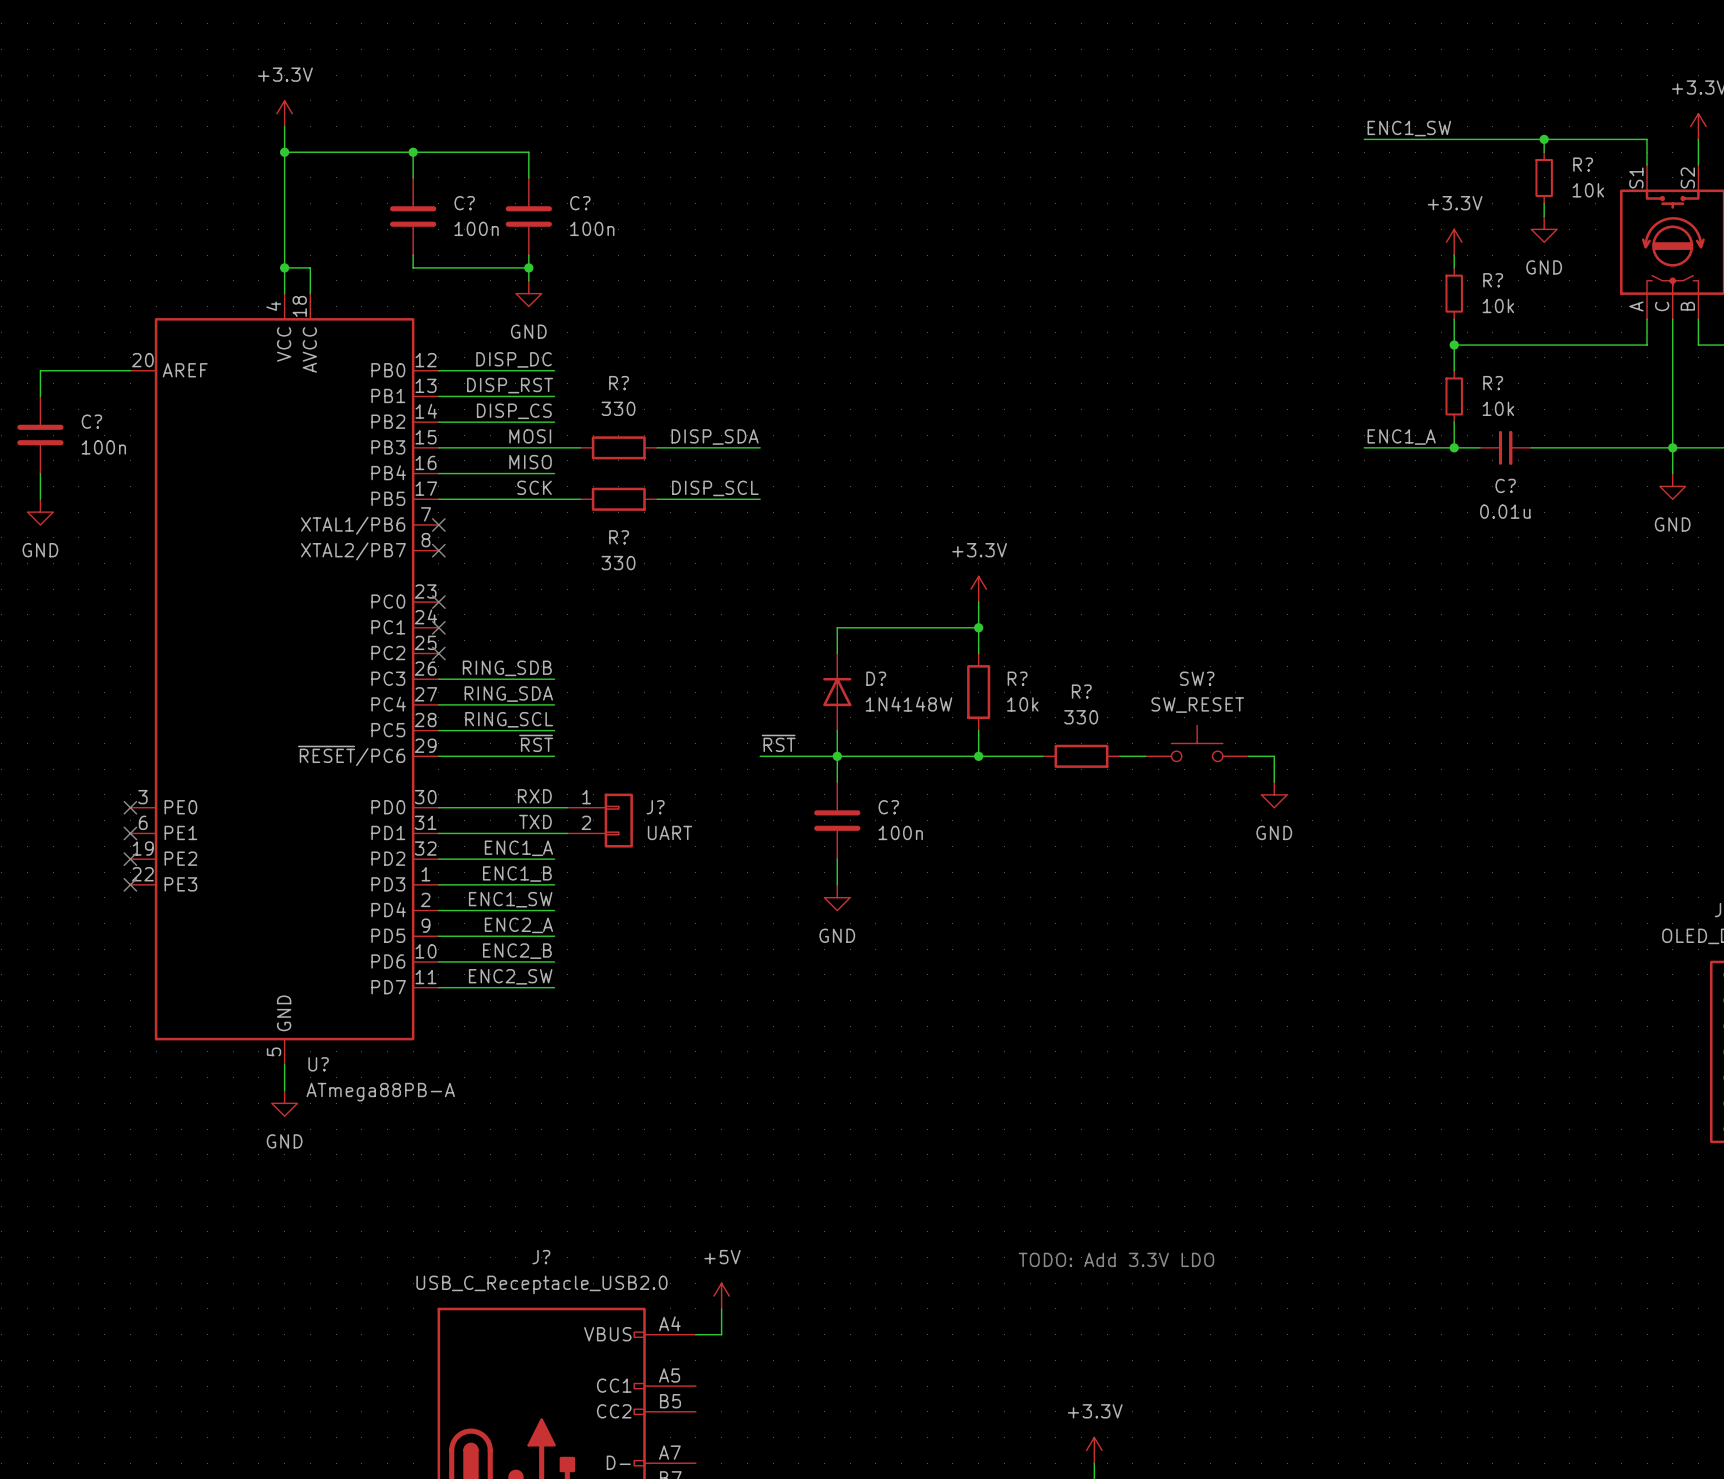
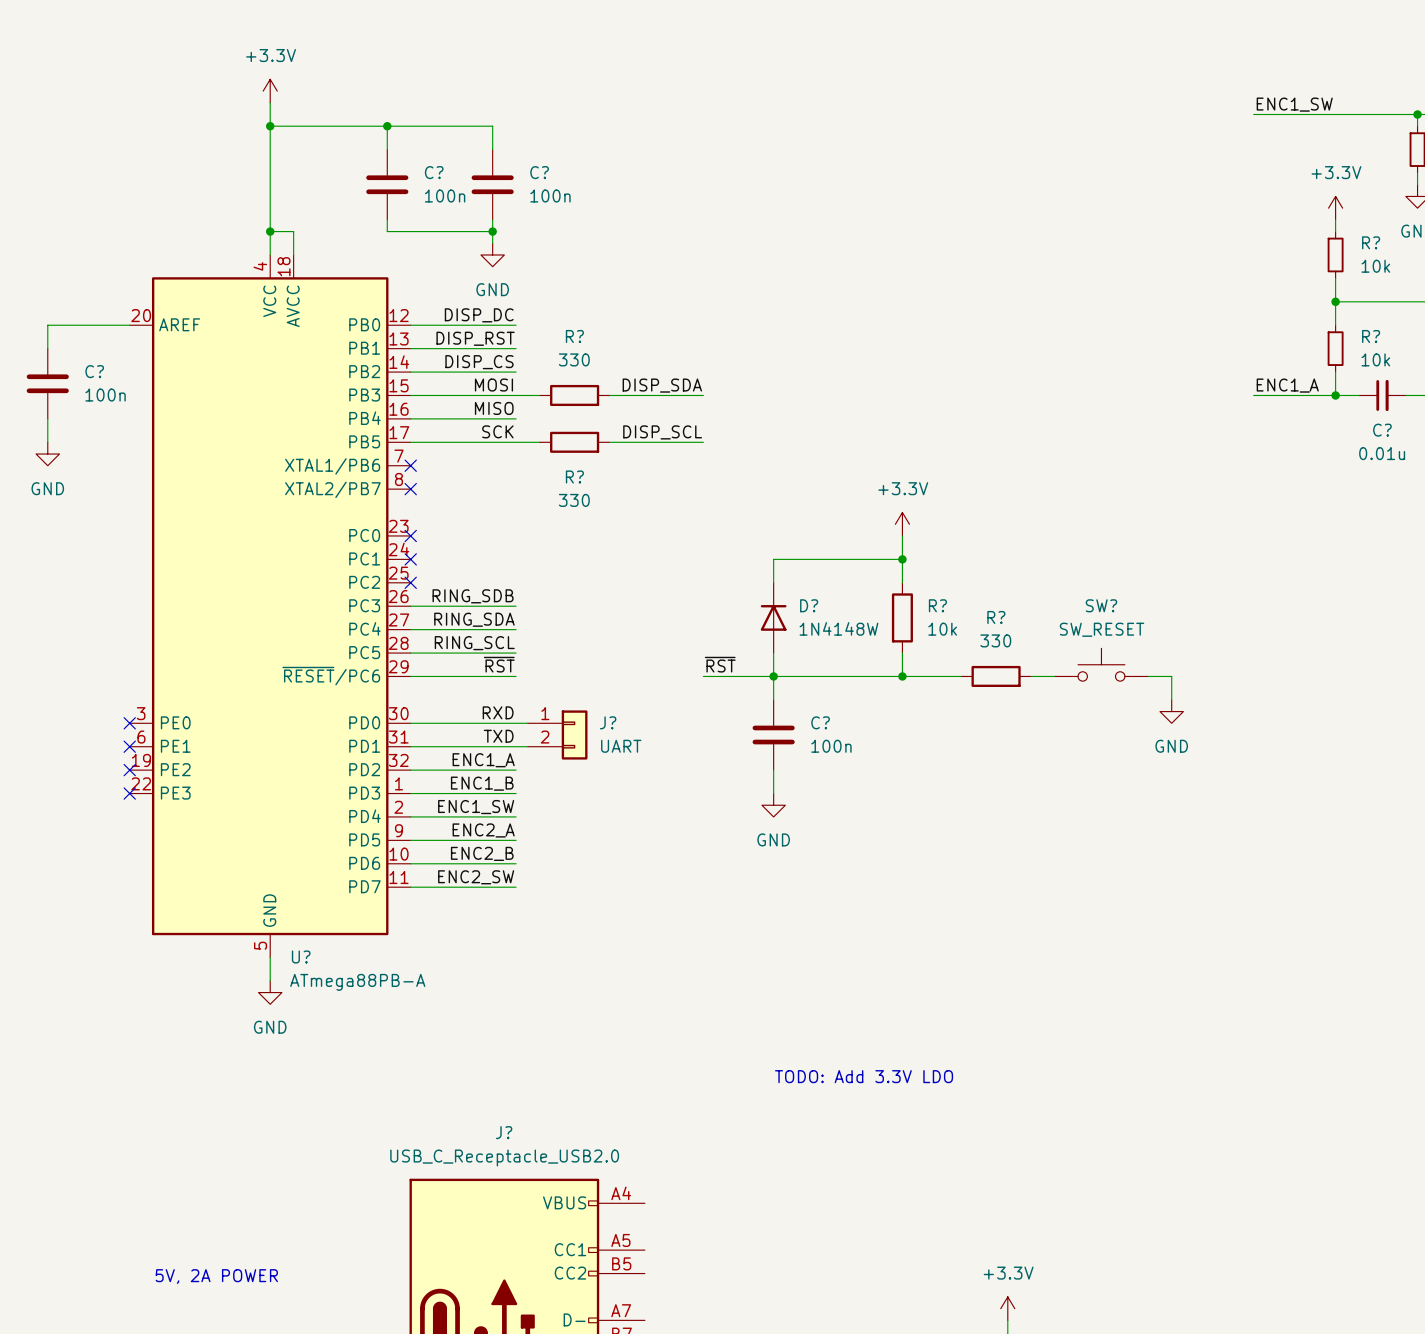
text position: TODO: Add 3.3V LDO (1116, 1259) -> TODO: Add 3.3V LDO (864, 1076)
power symbol: +5V (721, 1296) -> none
wire: (721, 1308) (721, 1334) (695, 1334) -> none
text: none -> 5V, 2A POWER (216, 1276)

